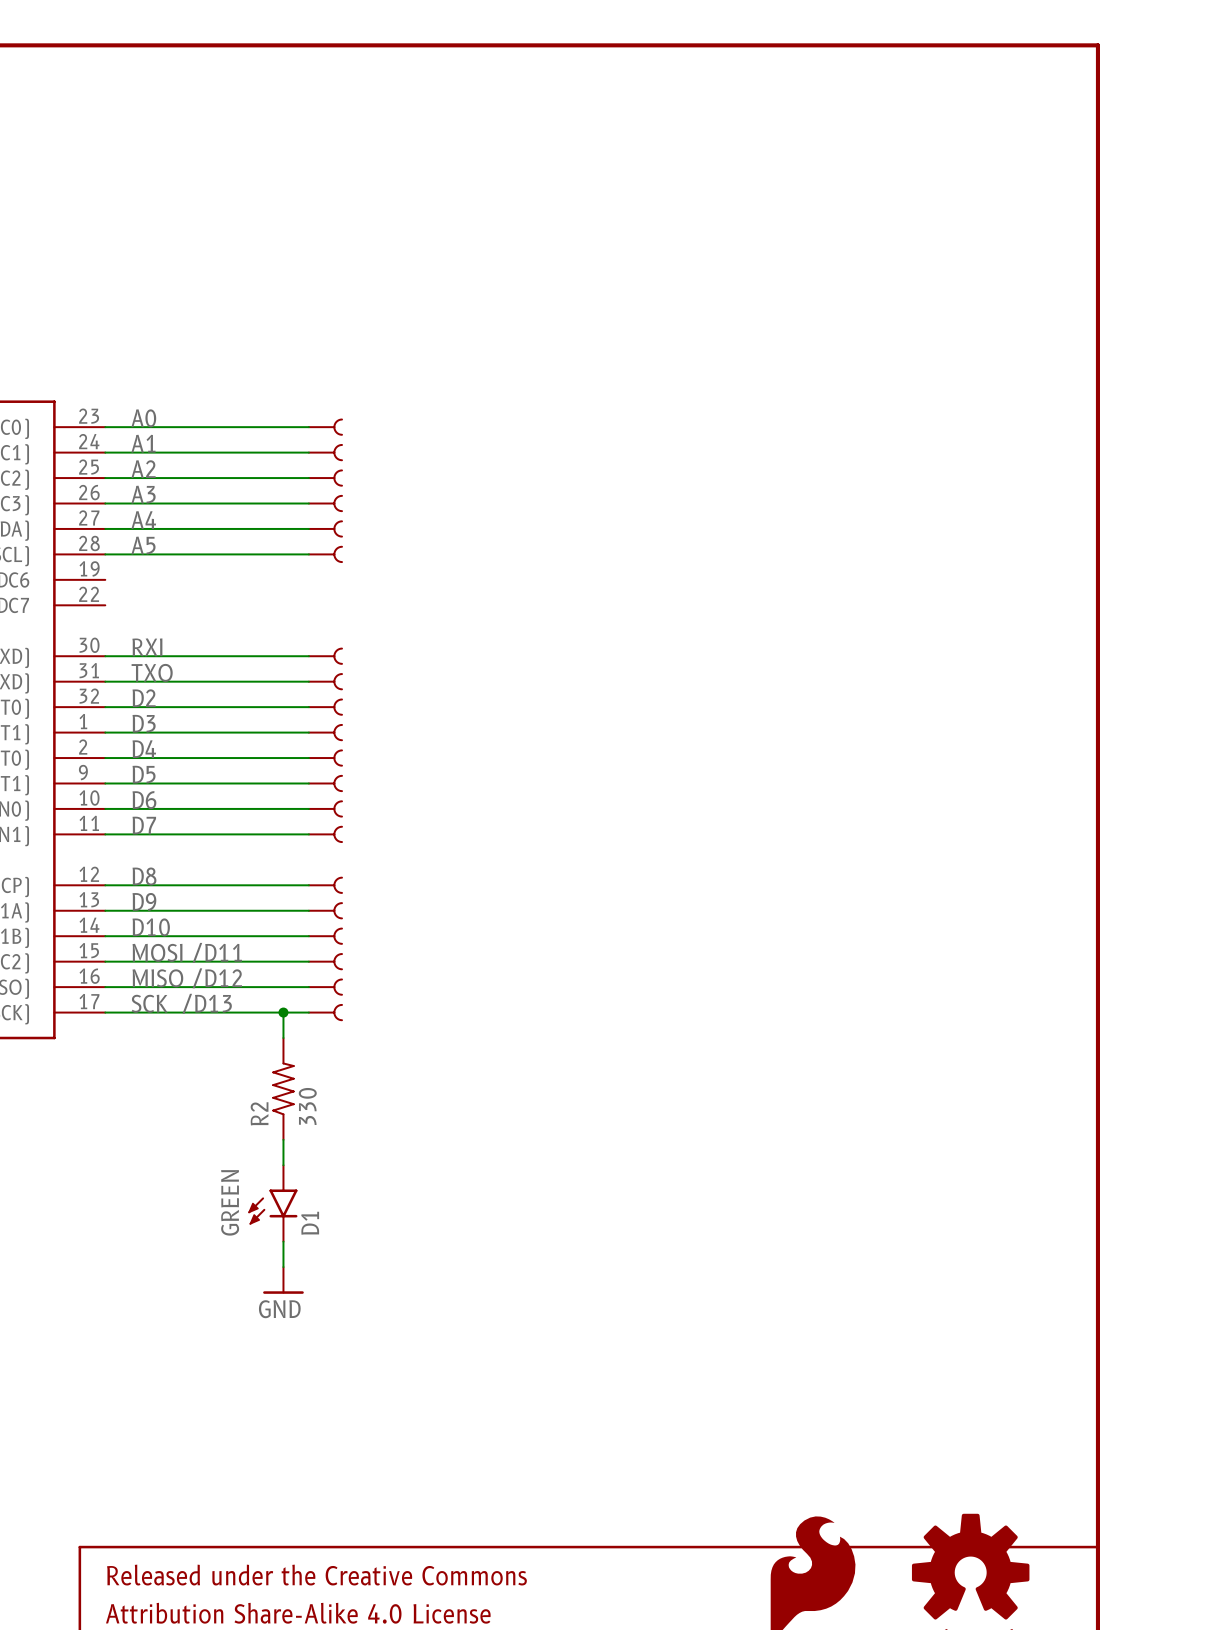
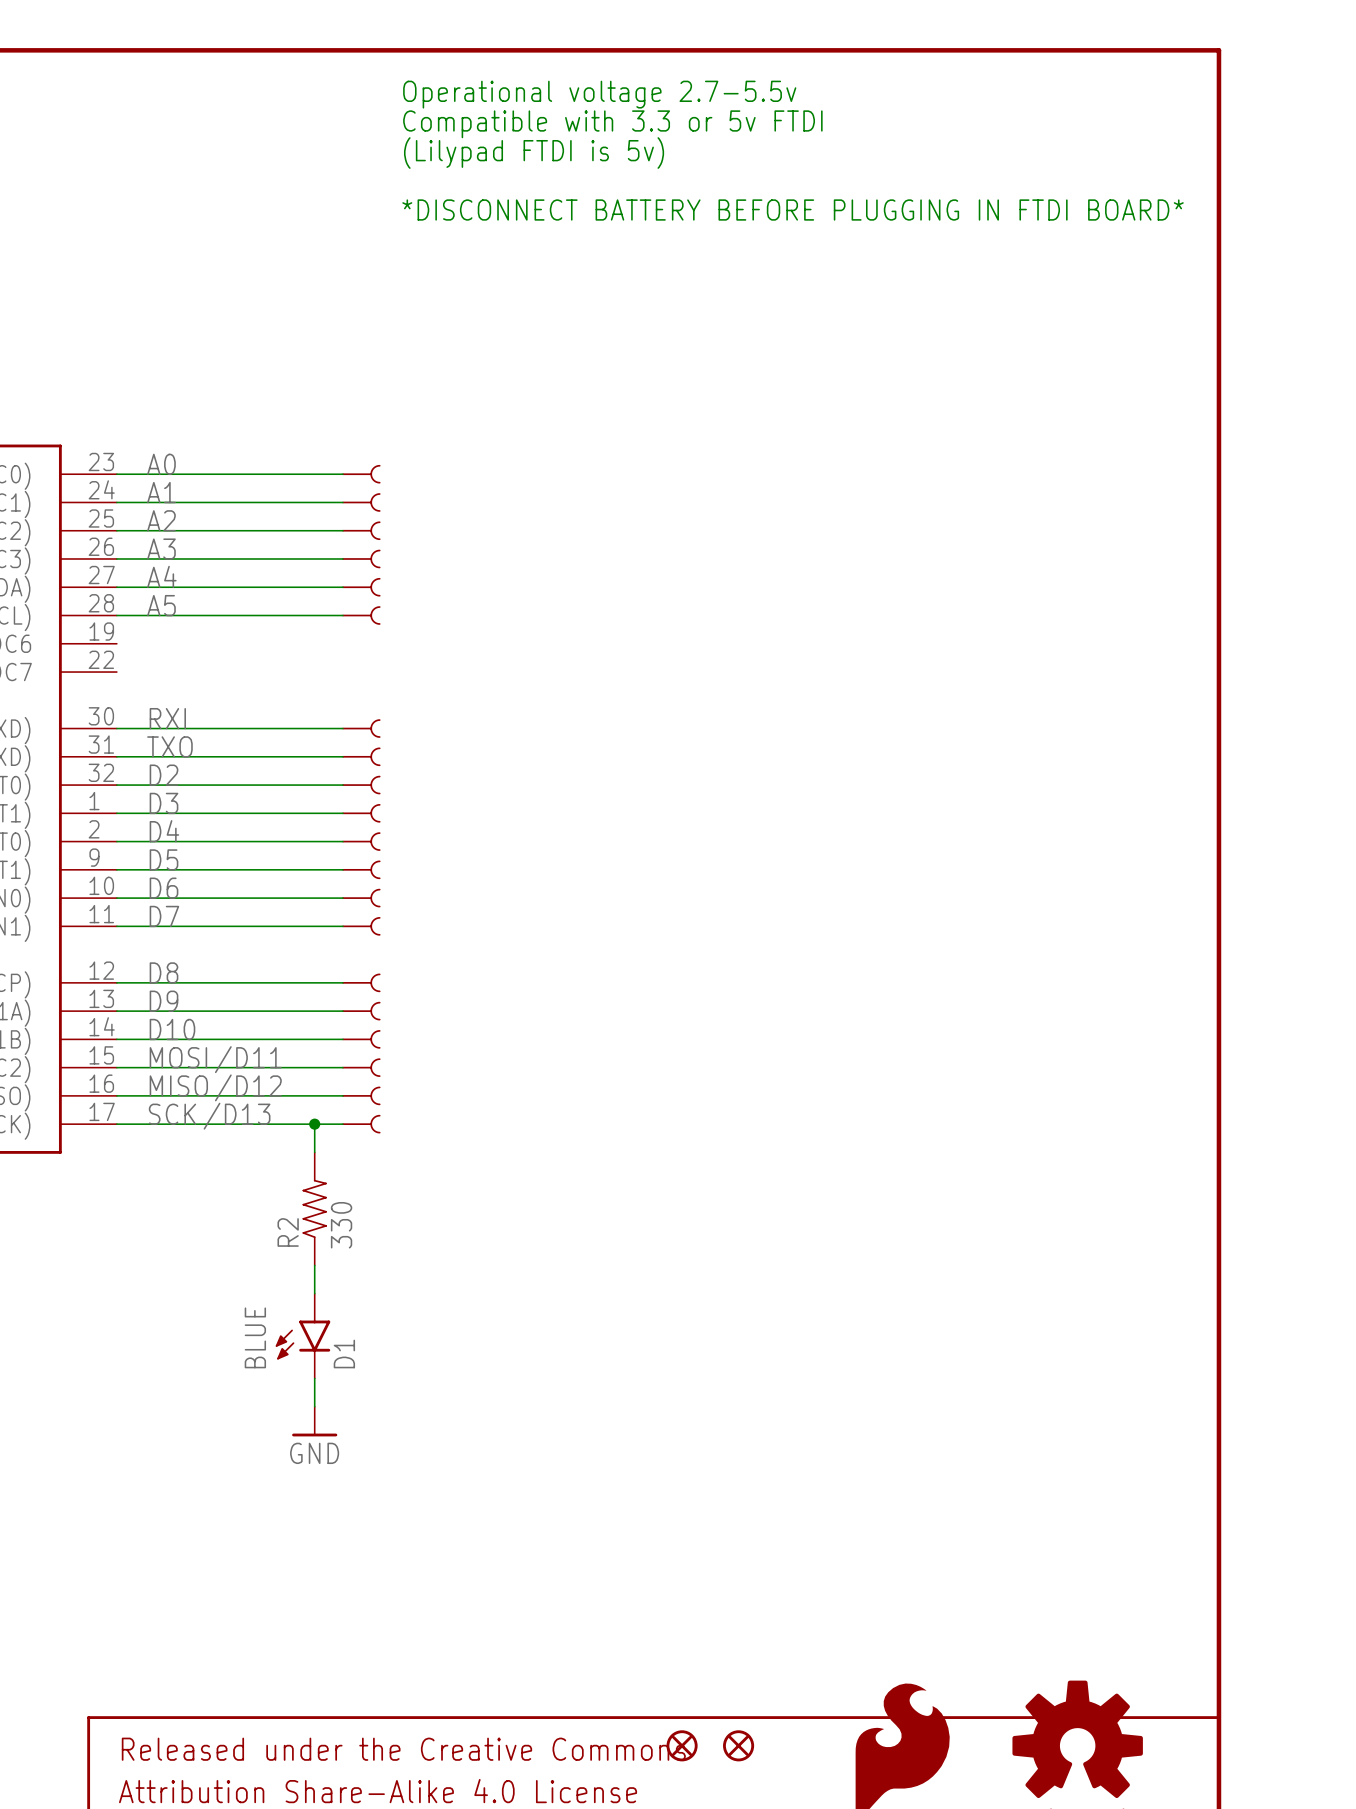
text: none -> Operational voltage 2.7-5.5v (599, 94)
text: none -> Compatible with 3.3 or 5v FTDI (612, 124)
text: none -> (Lilypad FTDI is 5v) (534, 153)
text: none -> *DISCONNECT BATTERY BEFORE PLUGGING IN FTDI BOARD* (793, 210)
D1 value: GREEN (230, 1202) -> BLUE (255, 1337)
part: none -> (682, 1745)
part: none -> (738, 1745)

